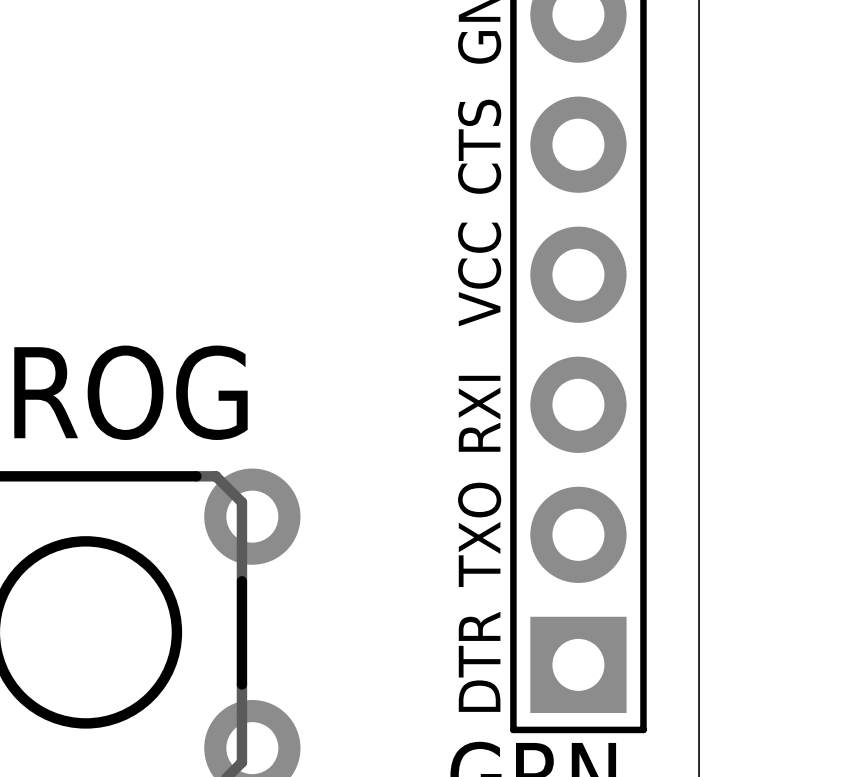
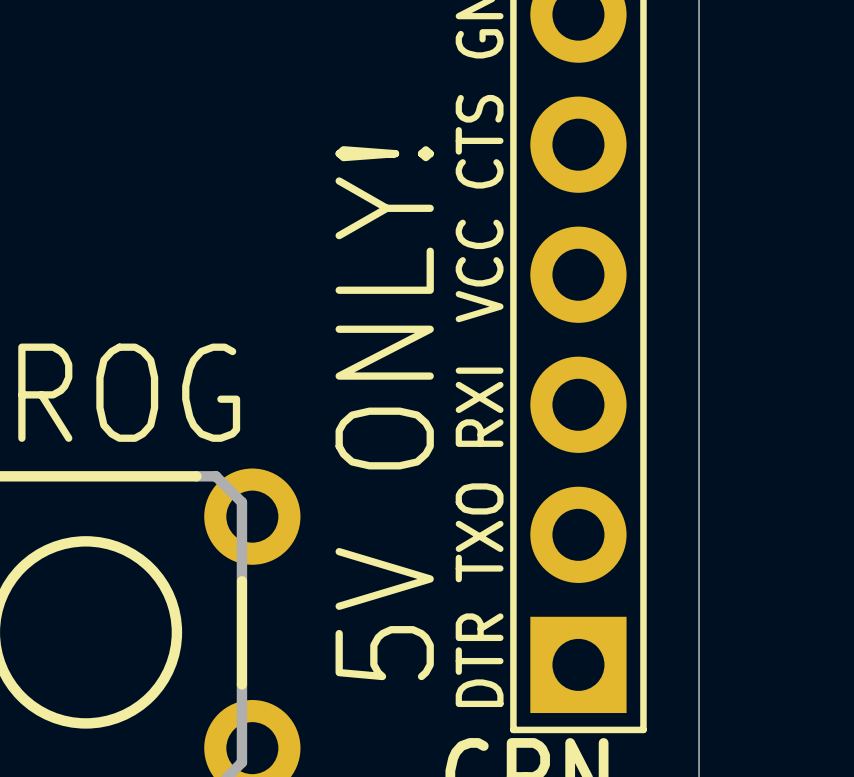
text: none -> 5V ONLY! (384, 413)

